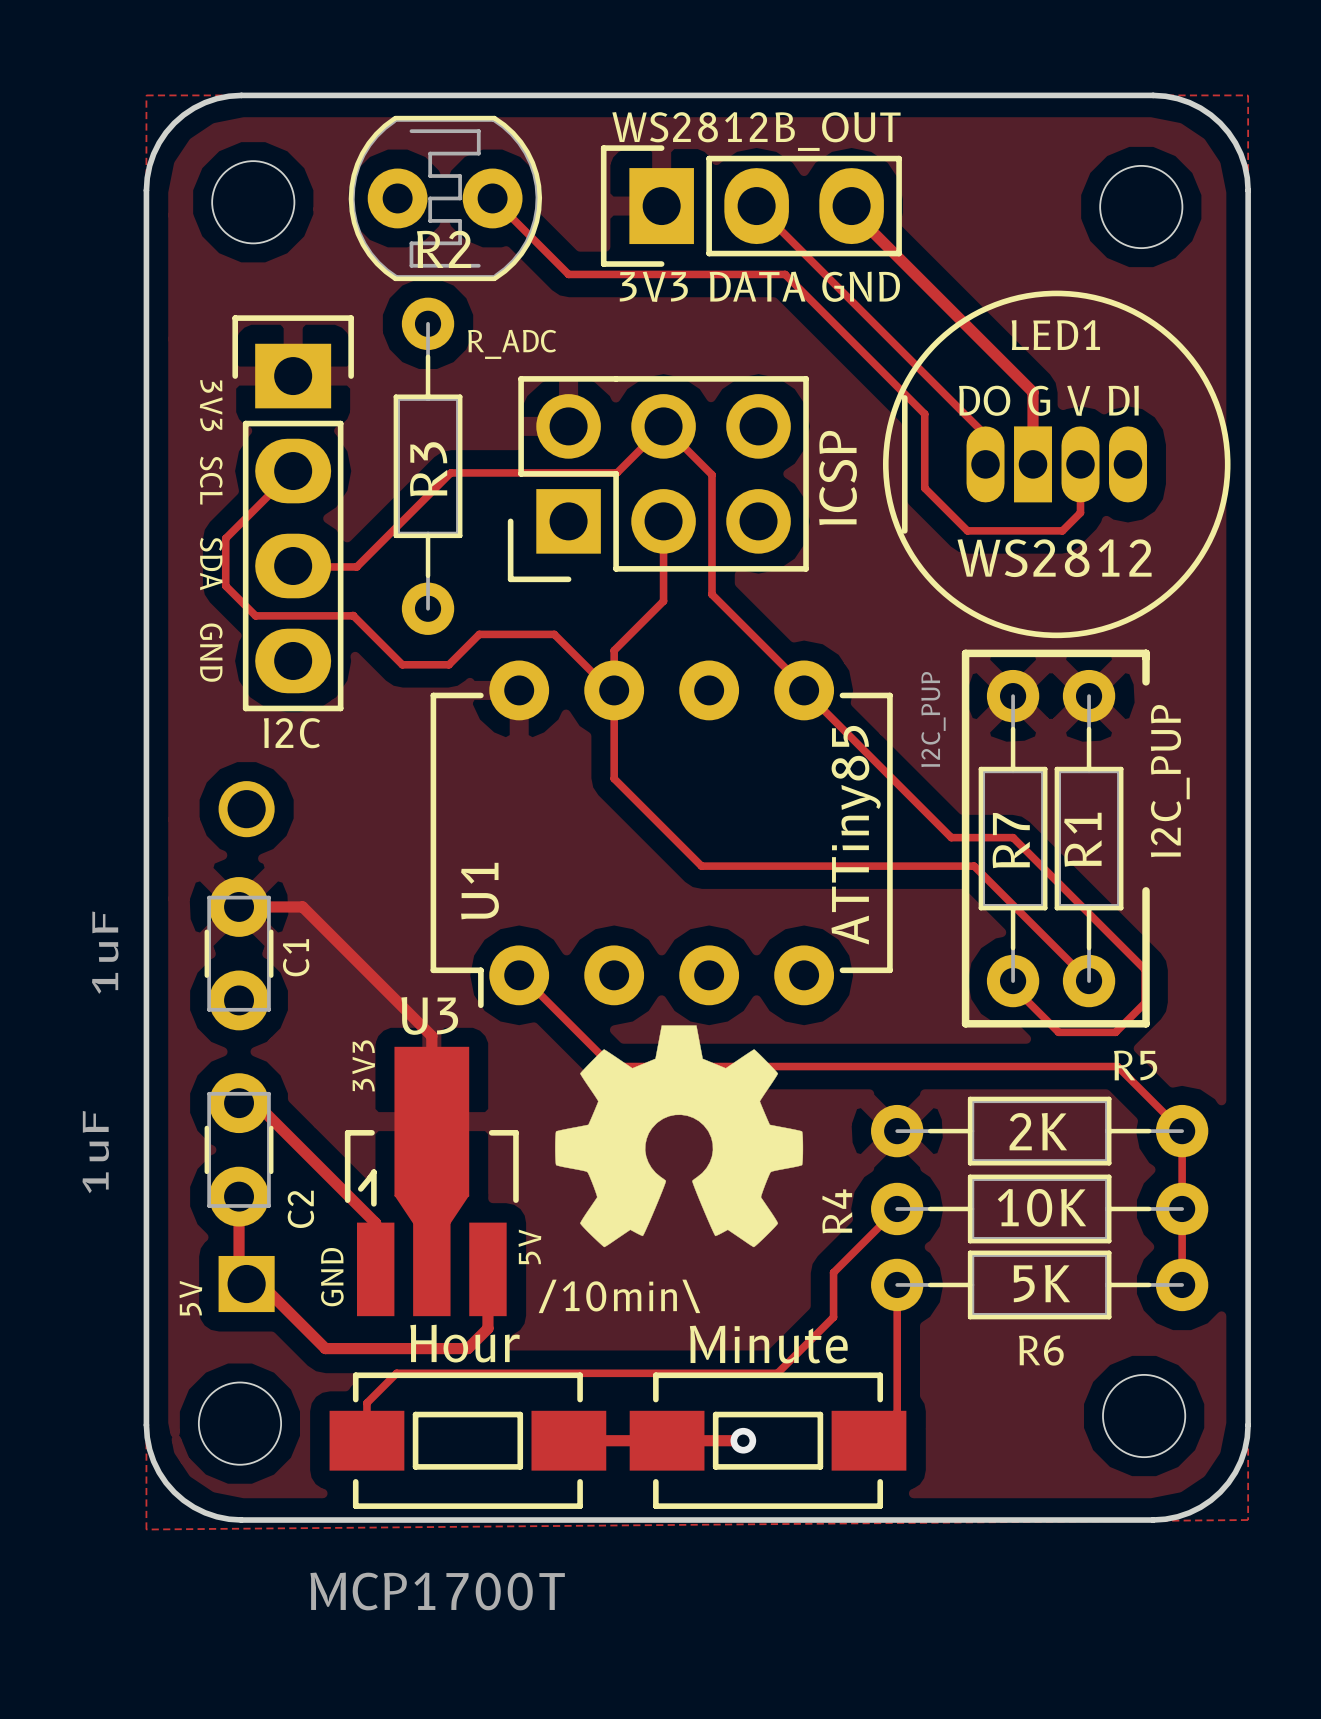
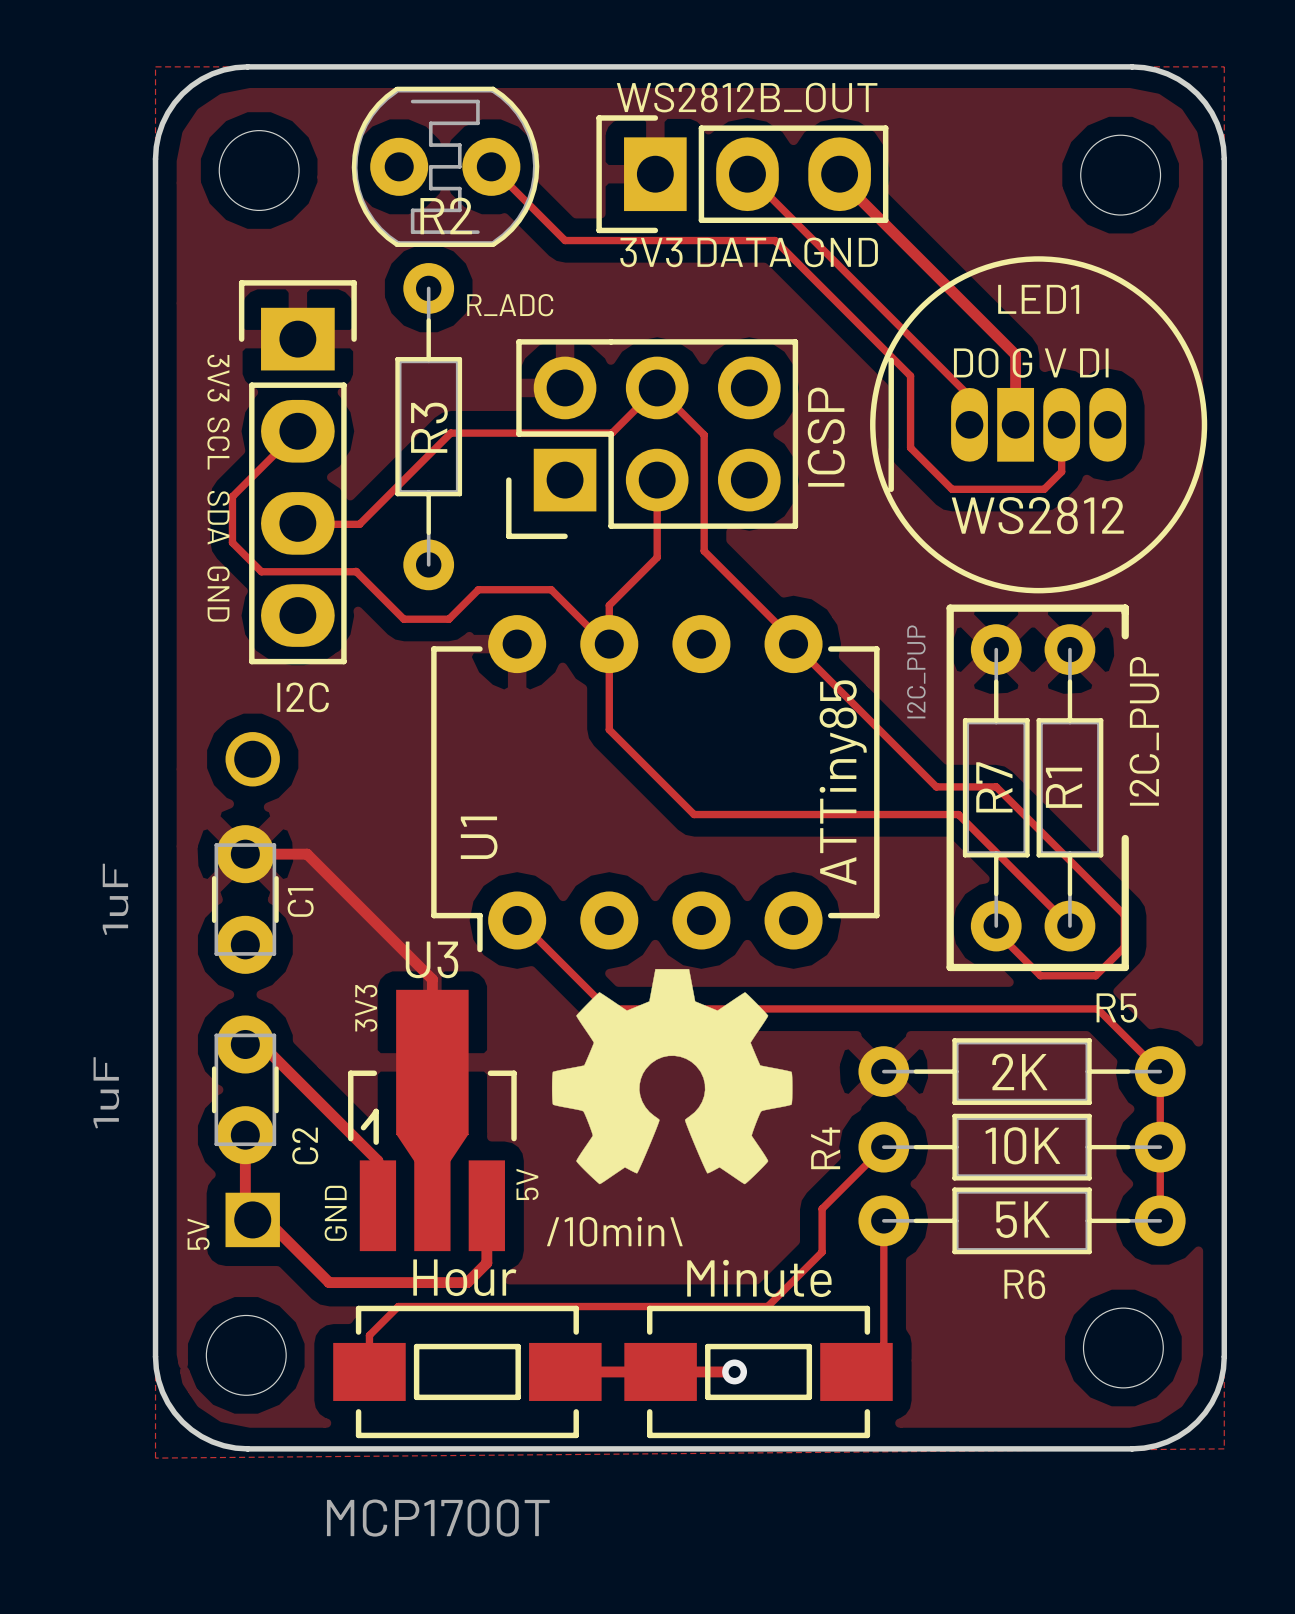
part value position: I2C (292, 733) -> I2C (303, 697)

